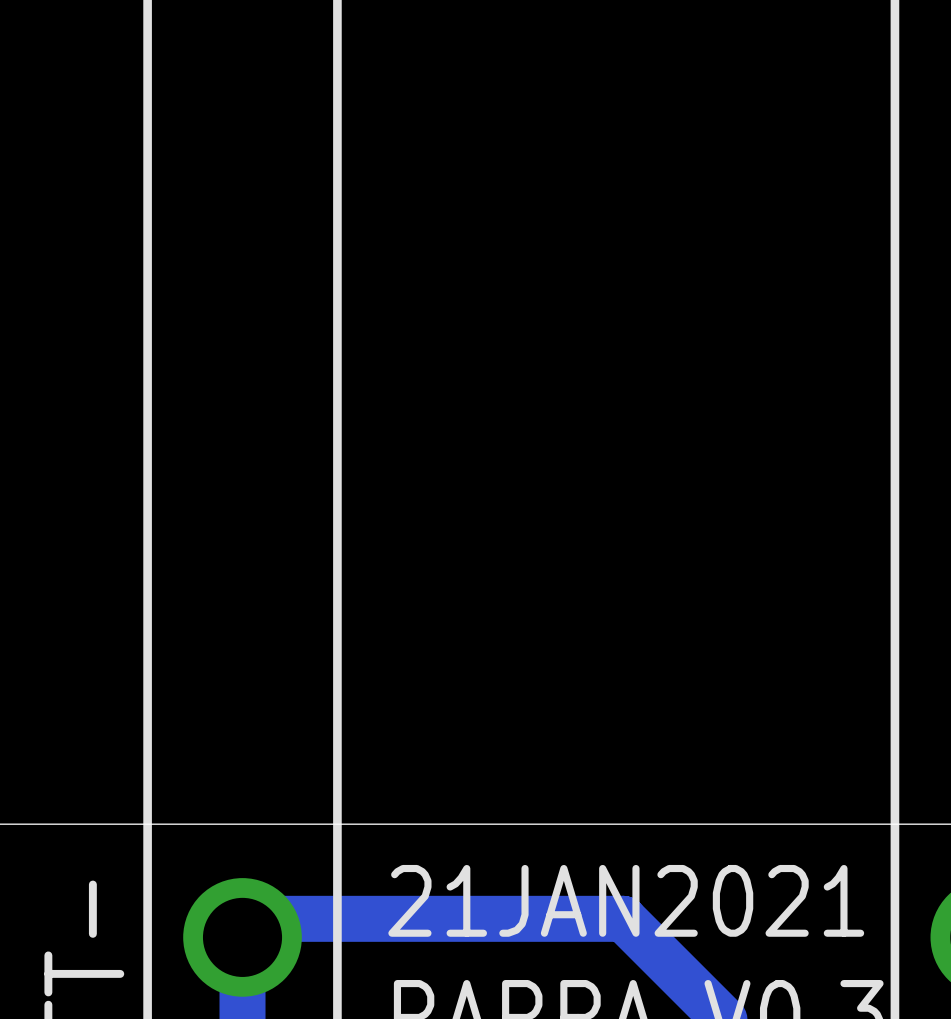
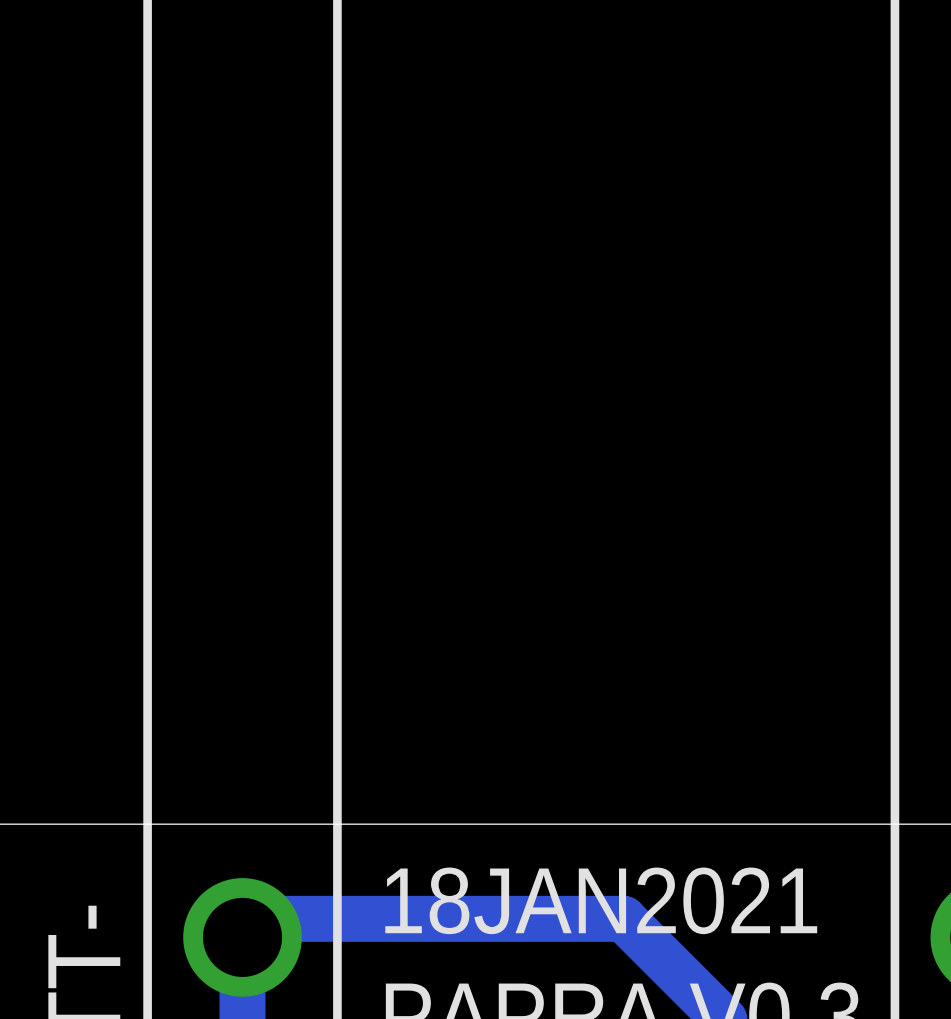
text: 21JAN2021 (626, 900) -> 18JAN2021 (601, 900)

